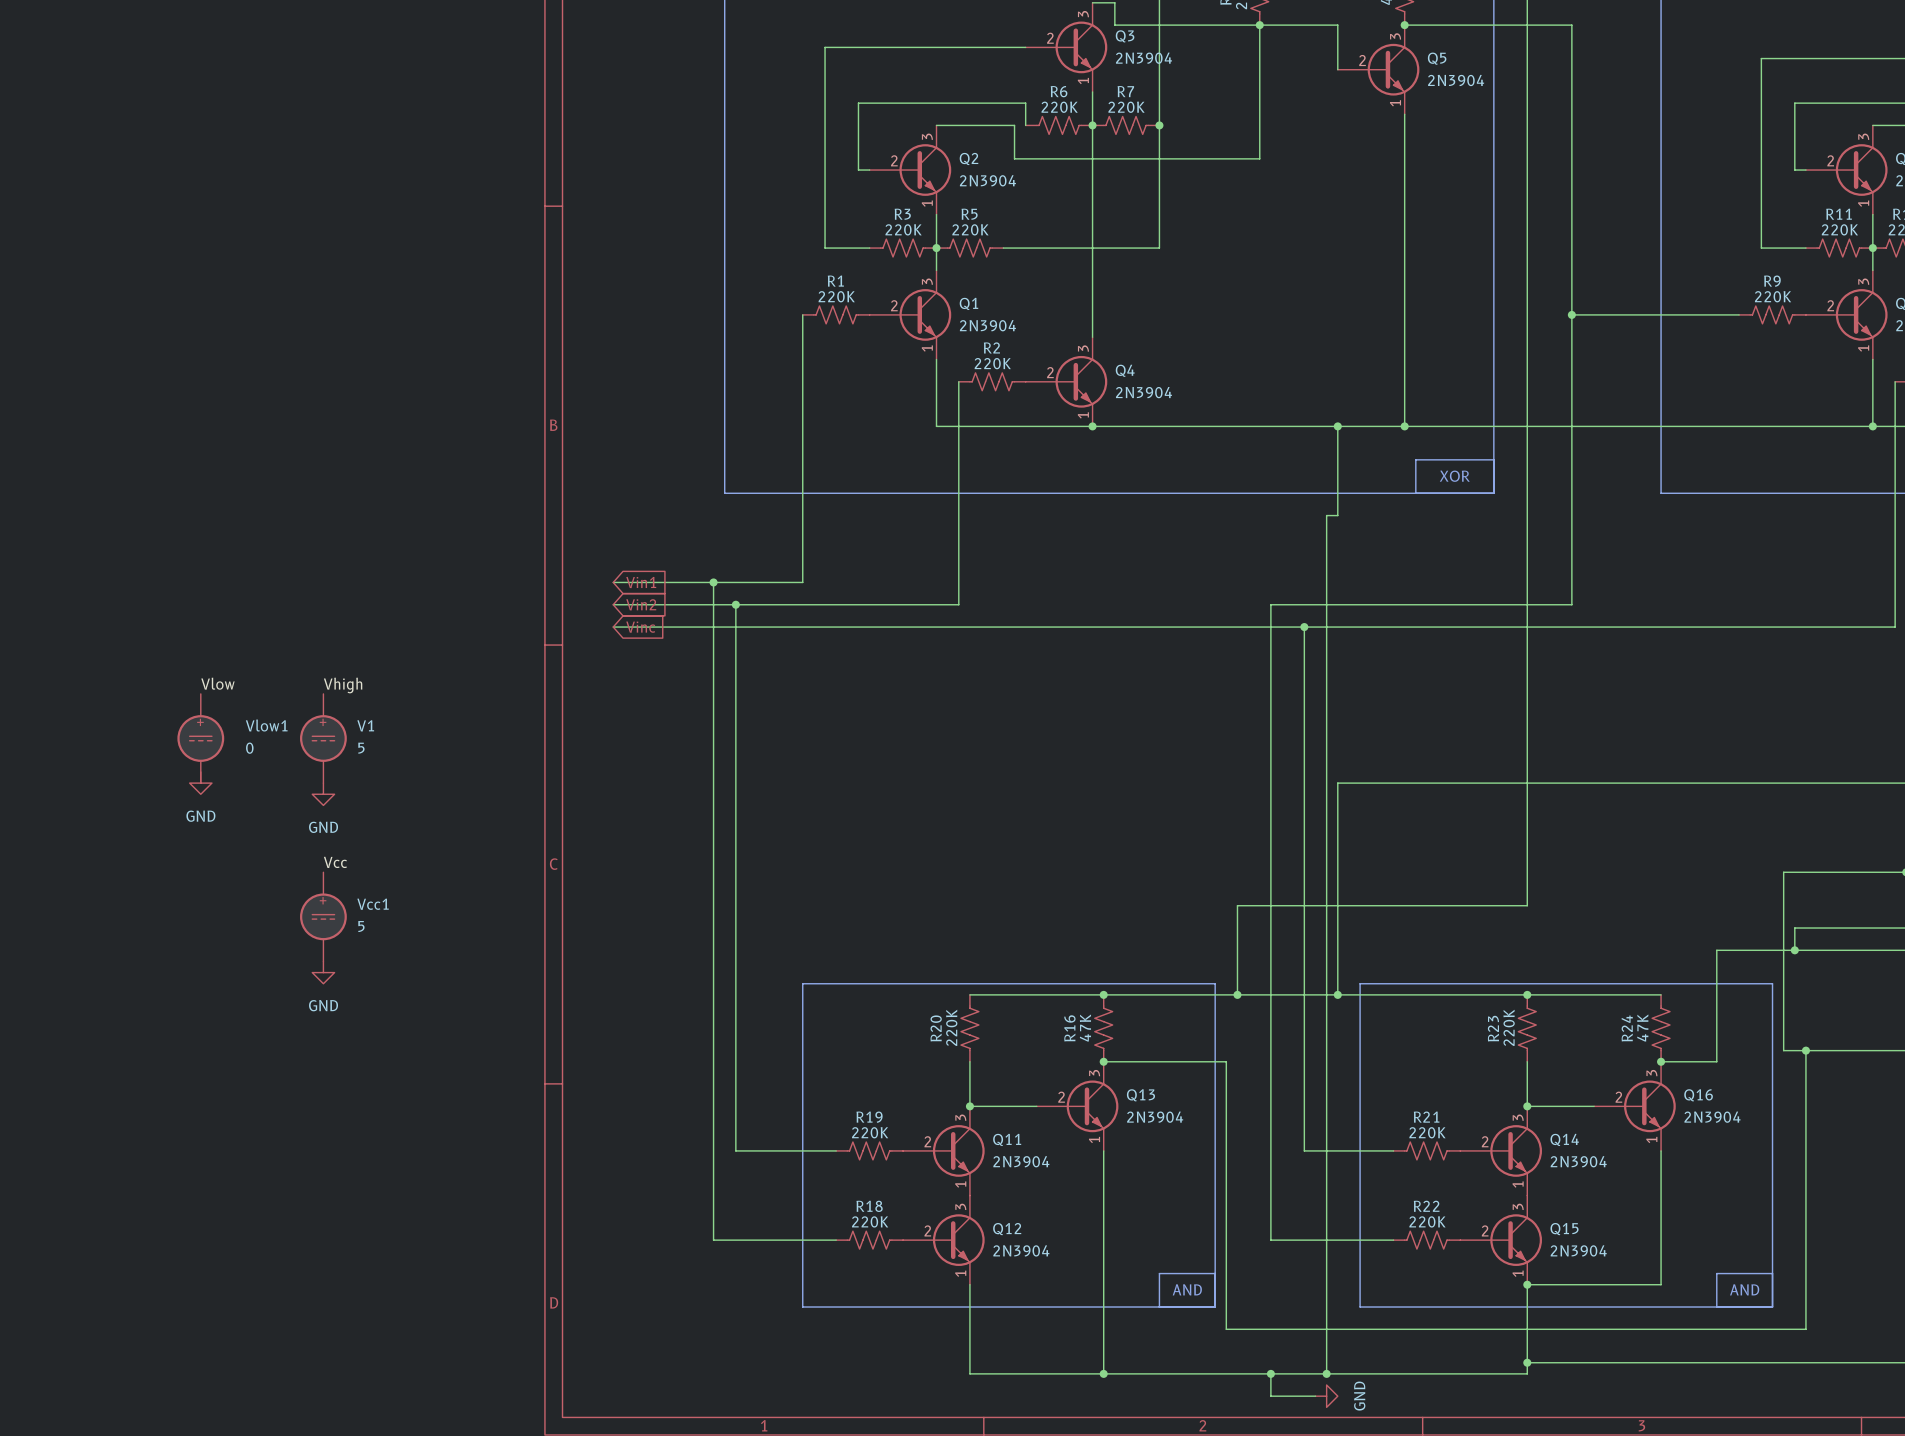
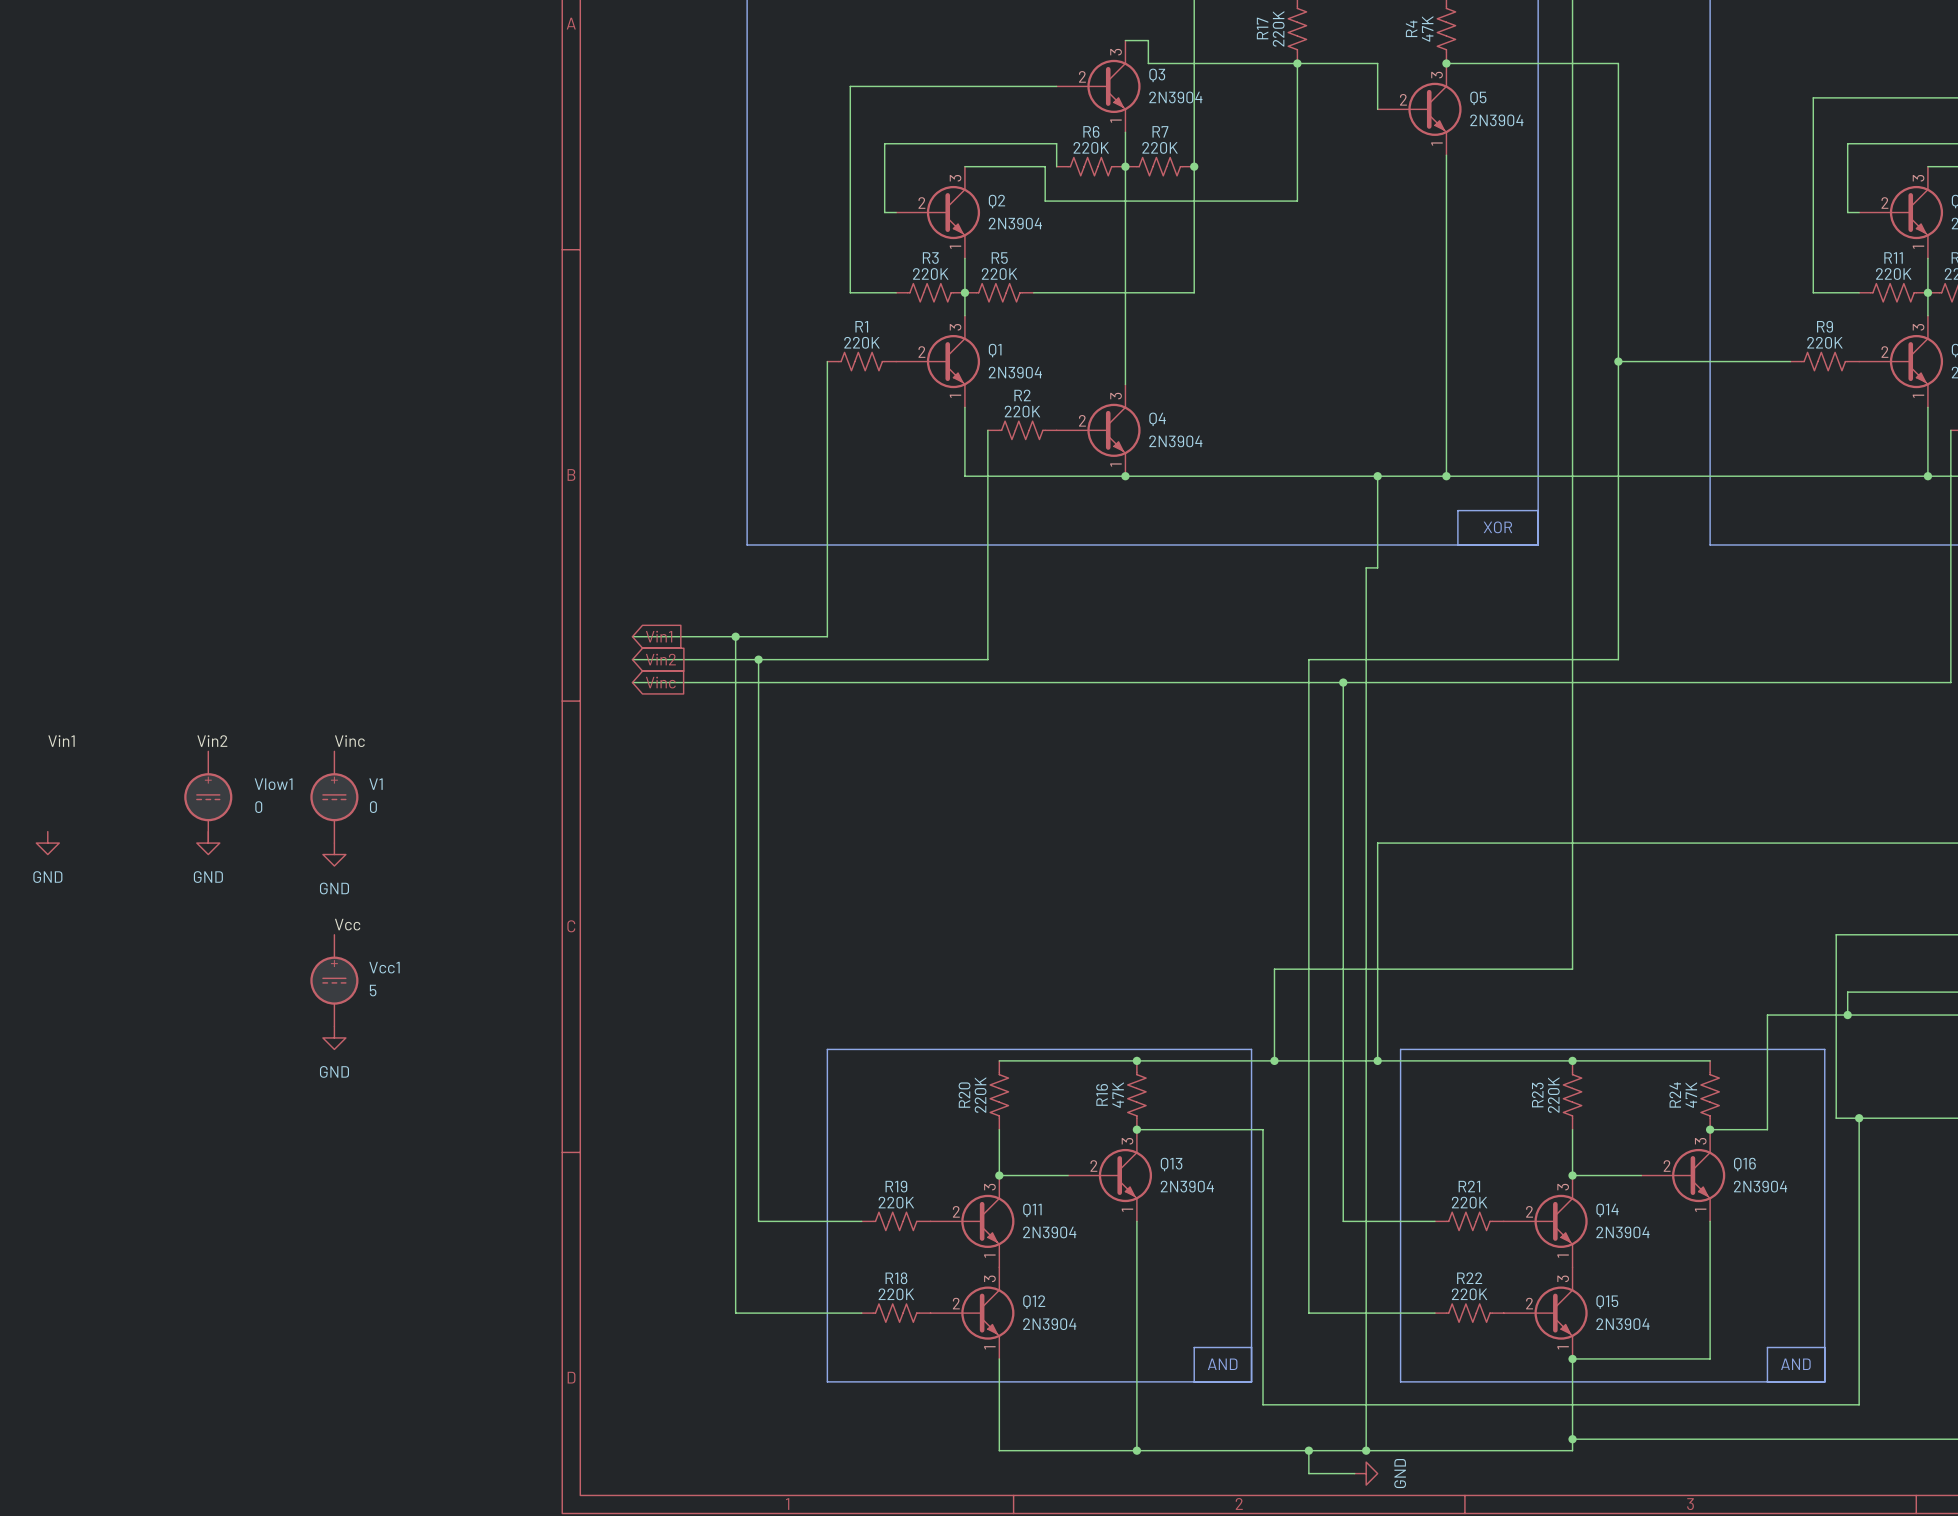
label: Vlow (217, 683) -> none
label: none -> Vin1 (61, 741)
label: none -> Vin2 (212, 741)
label: Vhigh (343, 685) -> Vinc (349, 741)
V1 value: 5 (361, 748) -> 0 (373, 807)
power symbol: none -> GND (47, 843)

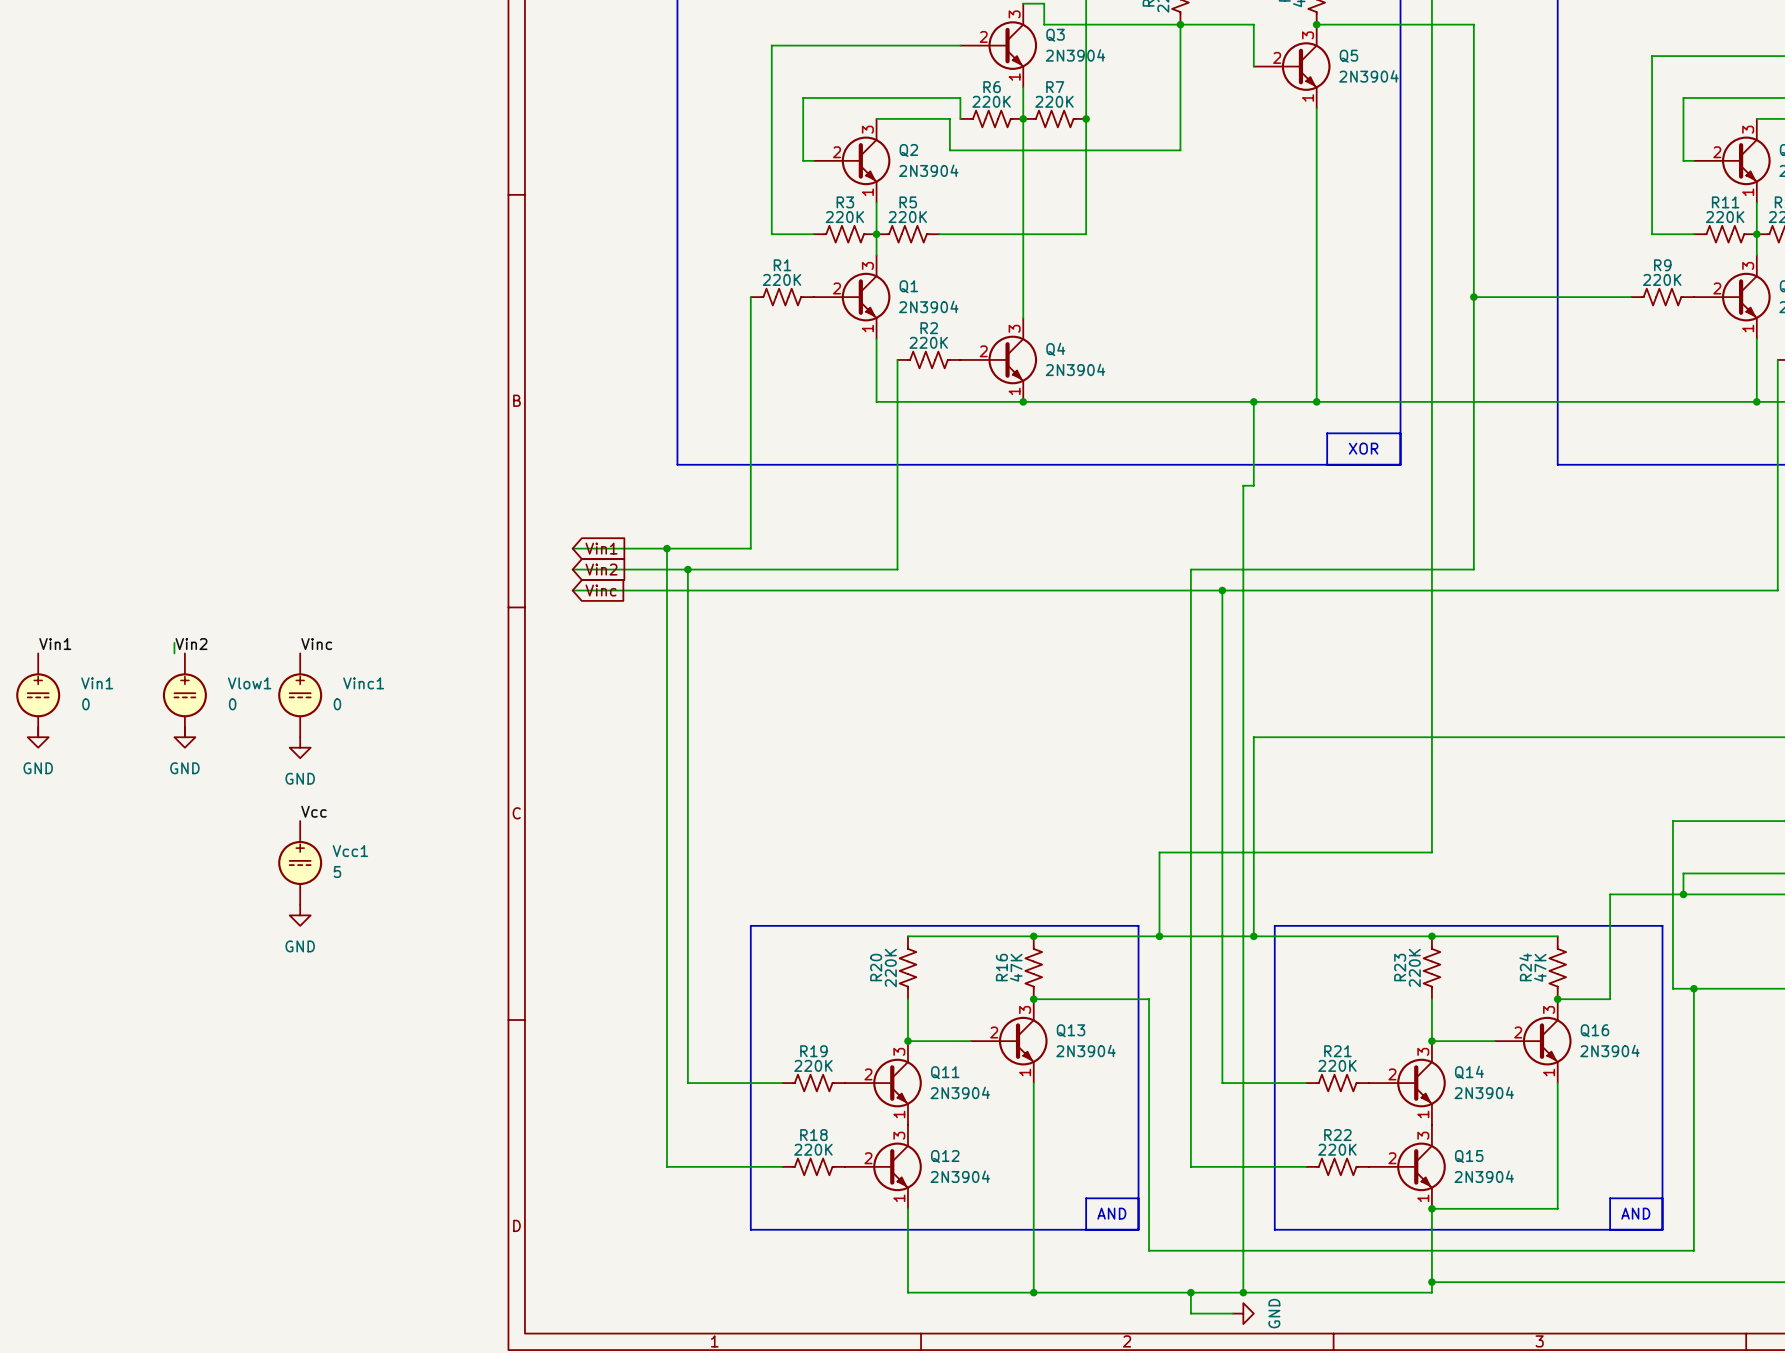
wire: none -> (174, 642) (174, 653)
V1 name: V1 (376, 784) -> Vinc1 (363, 683)
Vin1: none -> 0 (38, 695)

